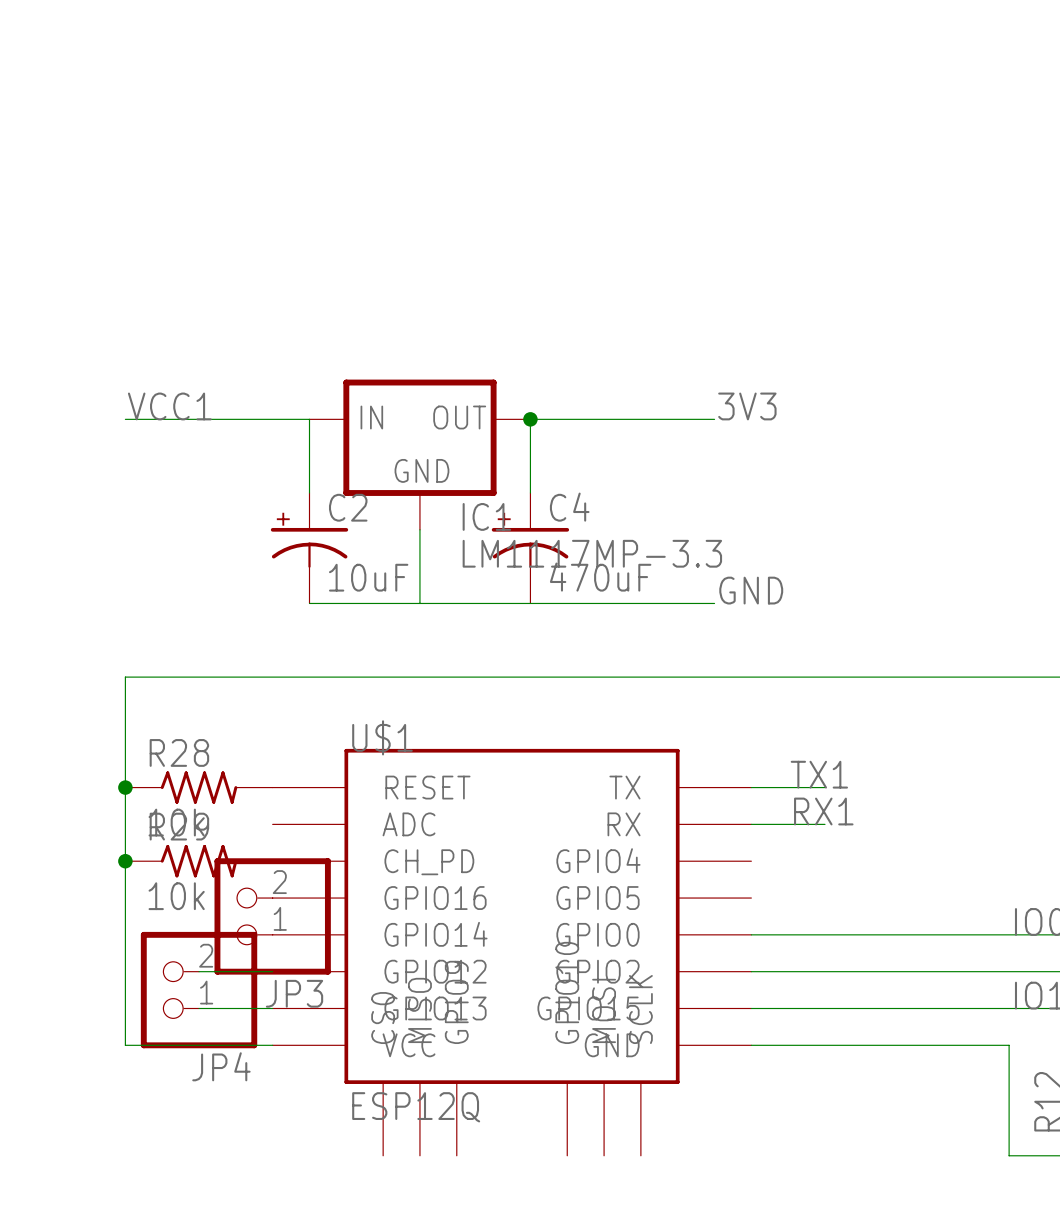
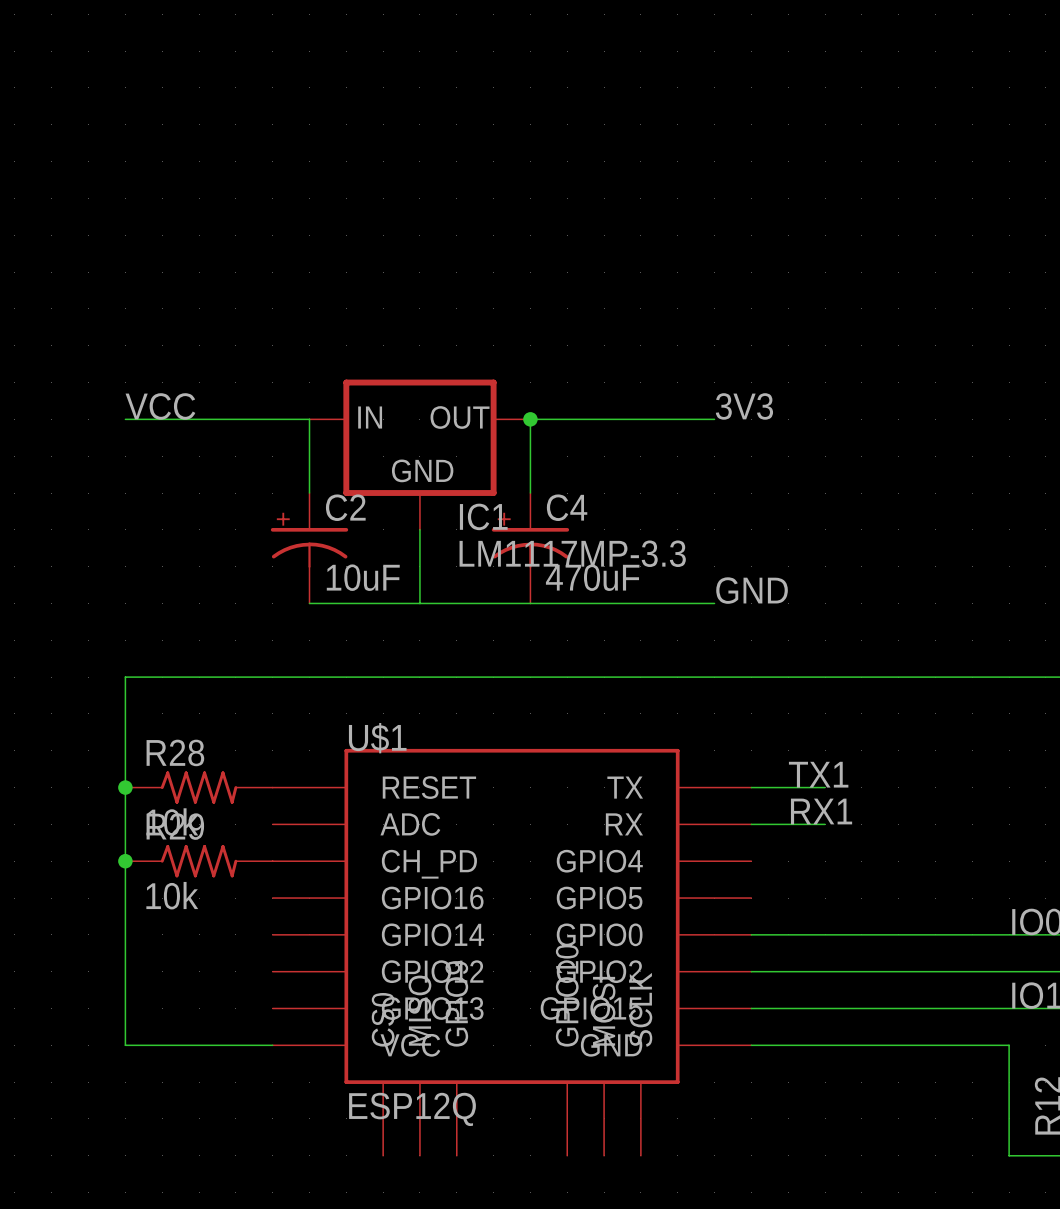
label: VCC1 (169, 406) -> VCC (160, 406)
JP3: (272, 916) -> none
wire: (199, 971) (272, 971) -> none
JP4: (199, 990) -> none
wire: (199, 1008) (272, 1008) -> none

